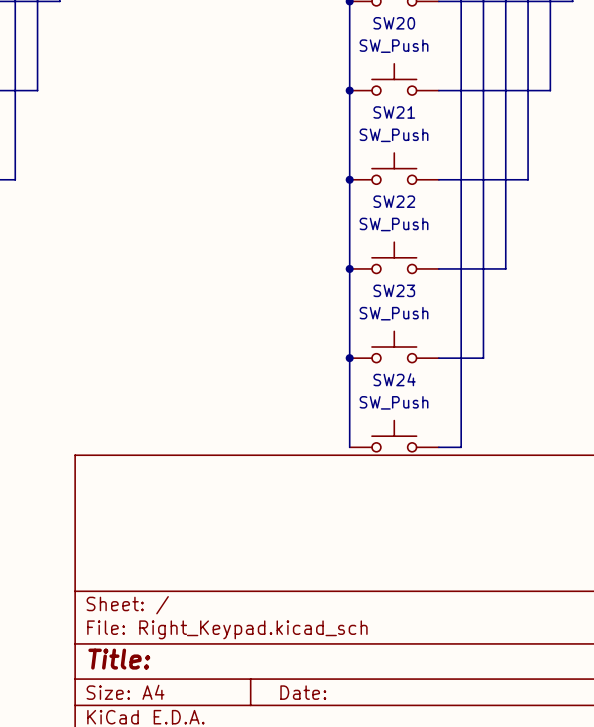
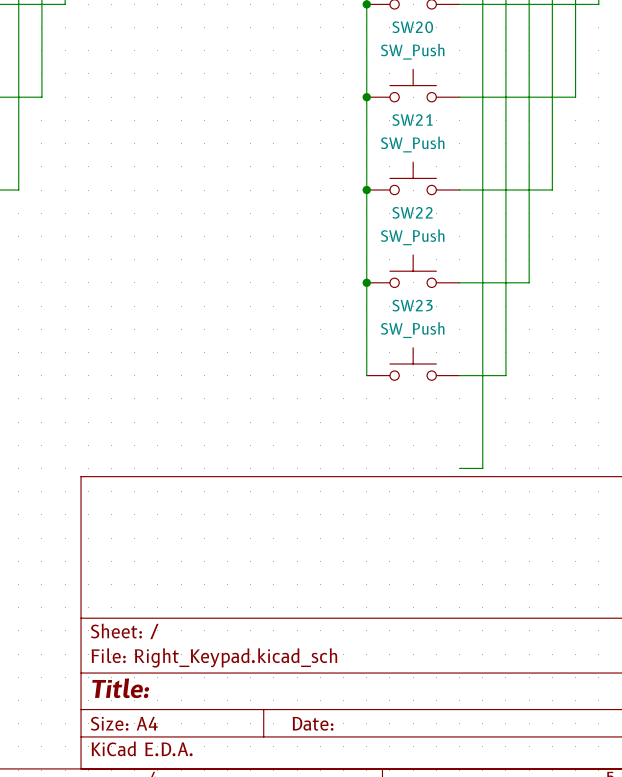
wire: (349, 358) (349, 447) -> none
junction: (349, 358) -> none
SW24: SW_Push (394, 436) -> none

